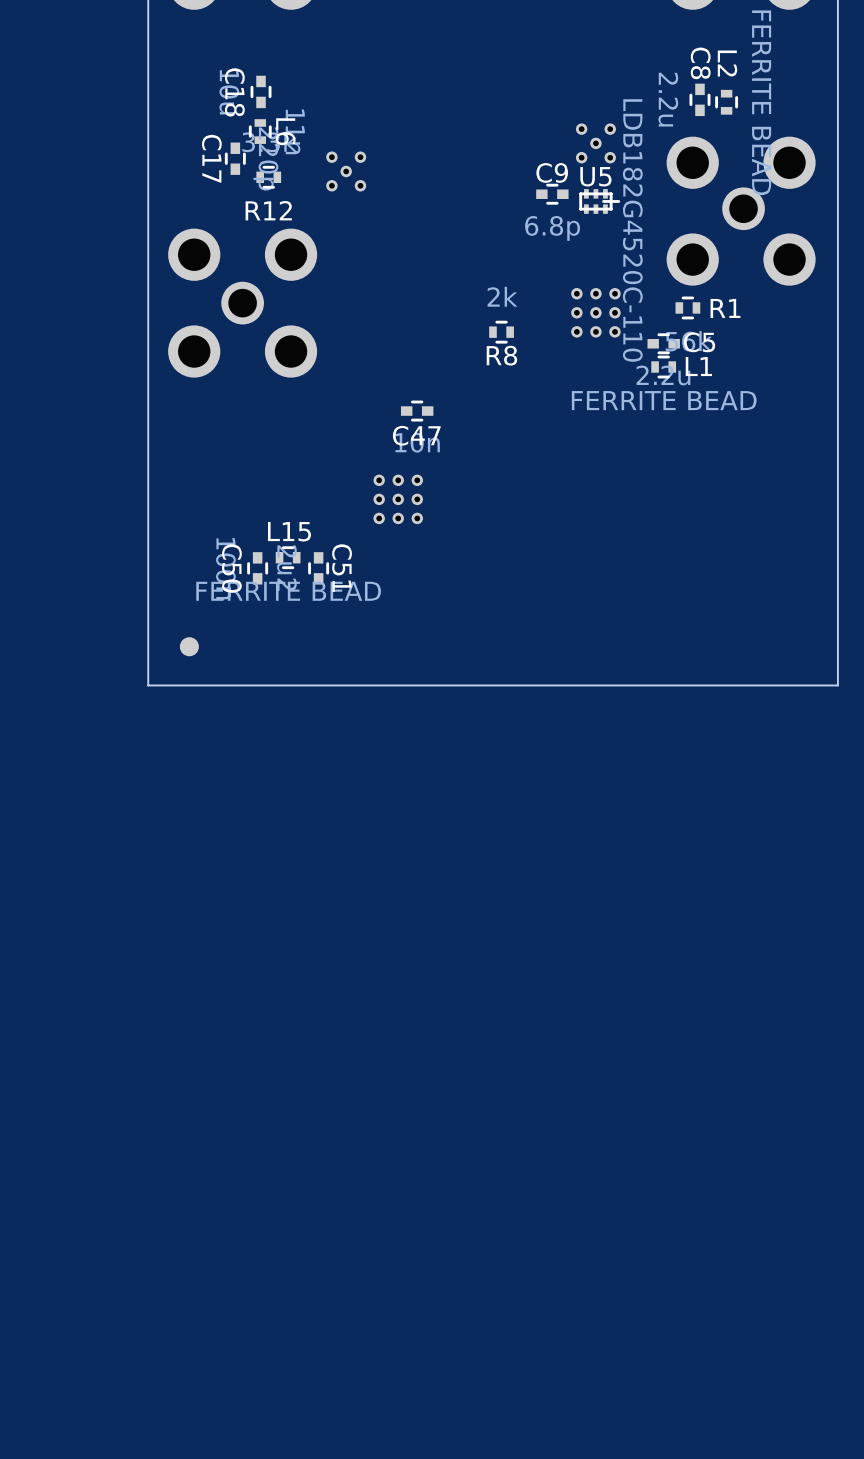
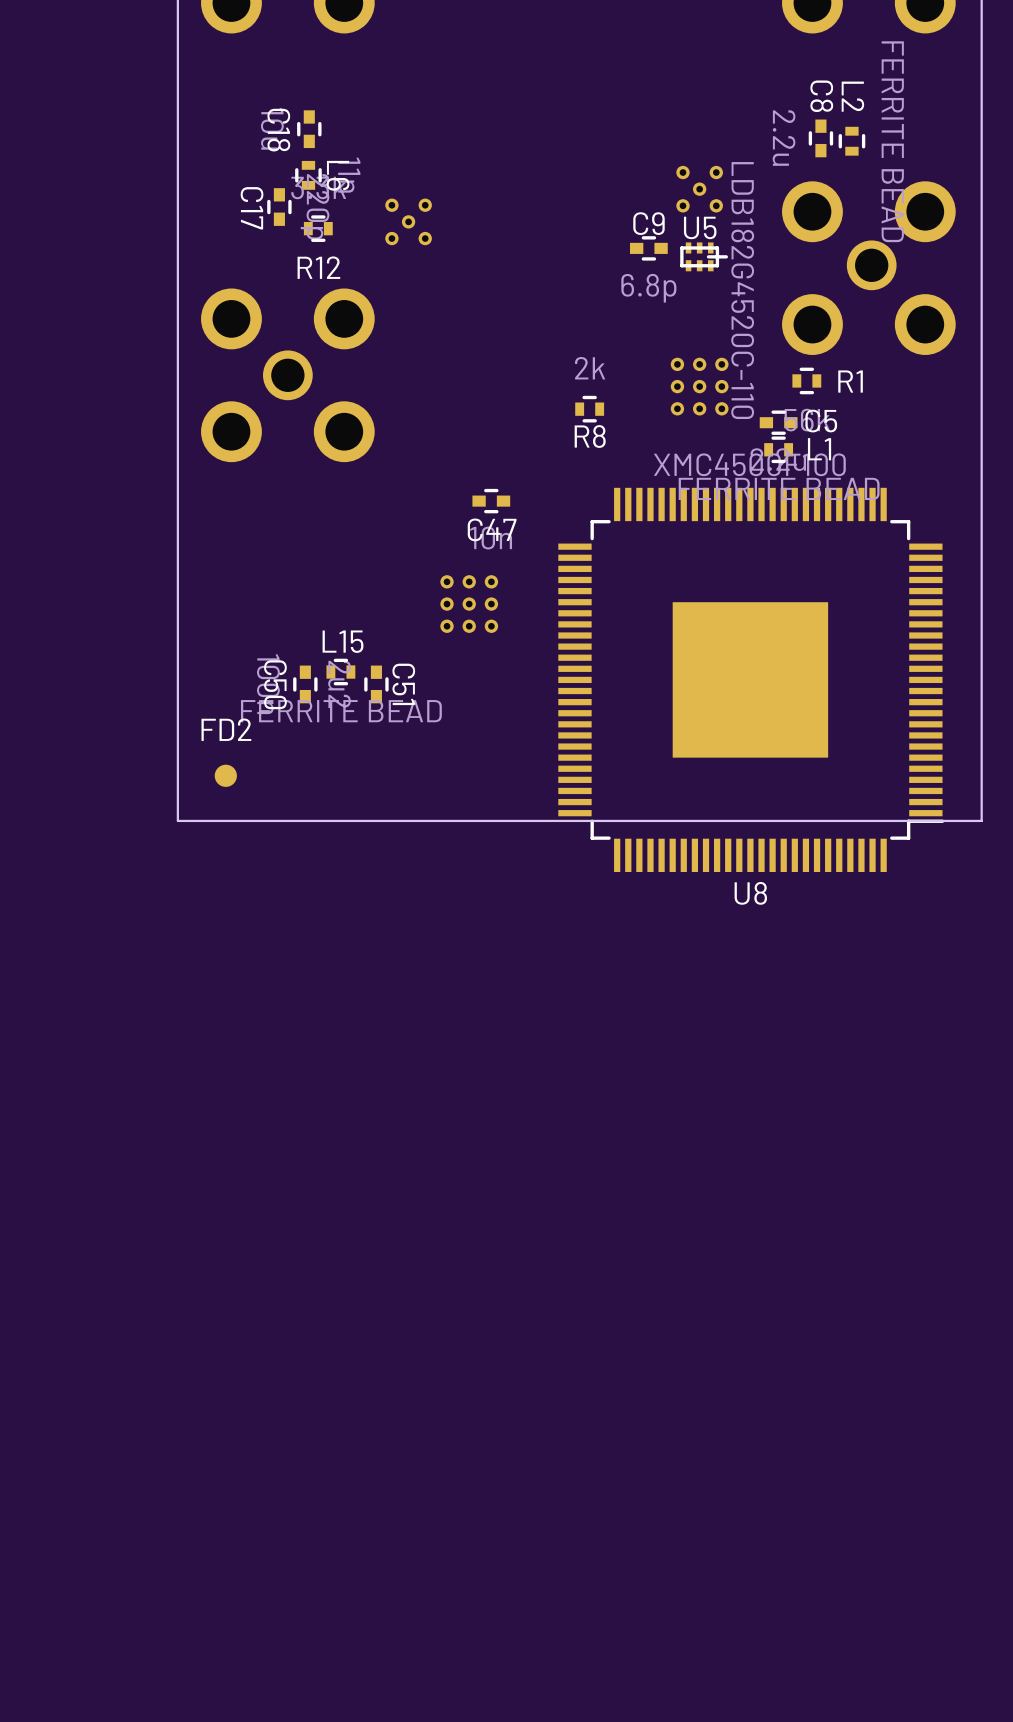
U8: none -> XMC4500F100 (751, 679)
FD2 name: none -> FD2 (226, 729)

